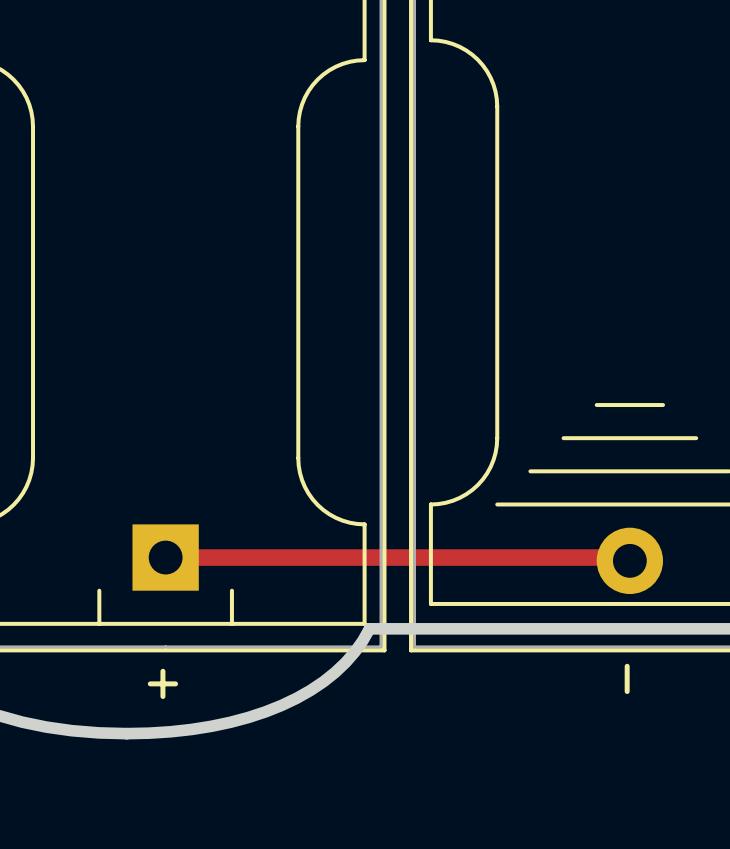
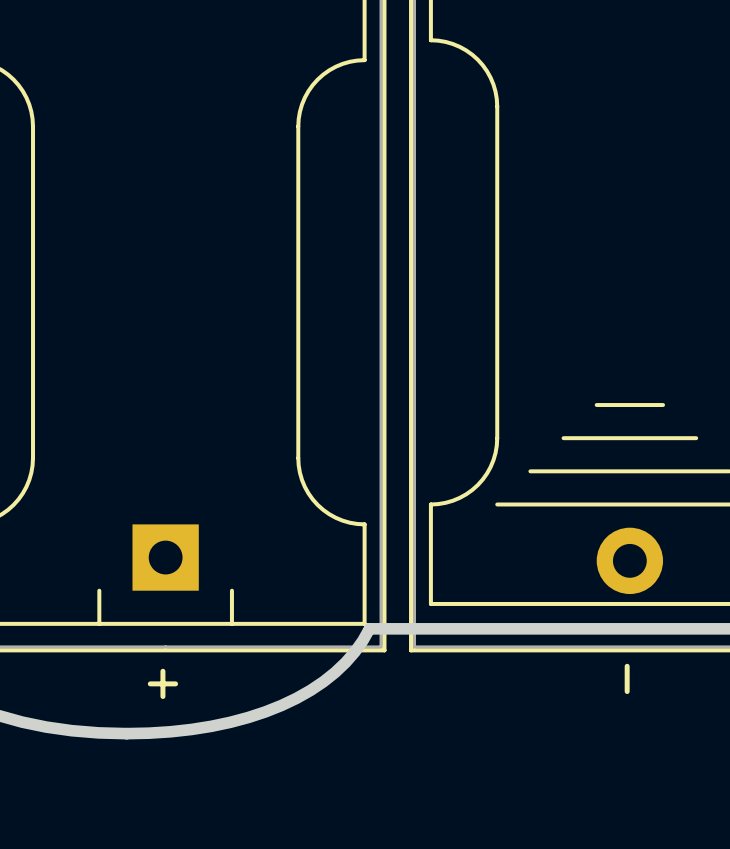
top track: (165, 557) (626, 557) (629, 560) -> none

